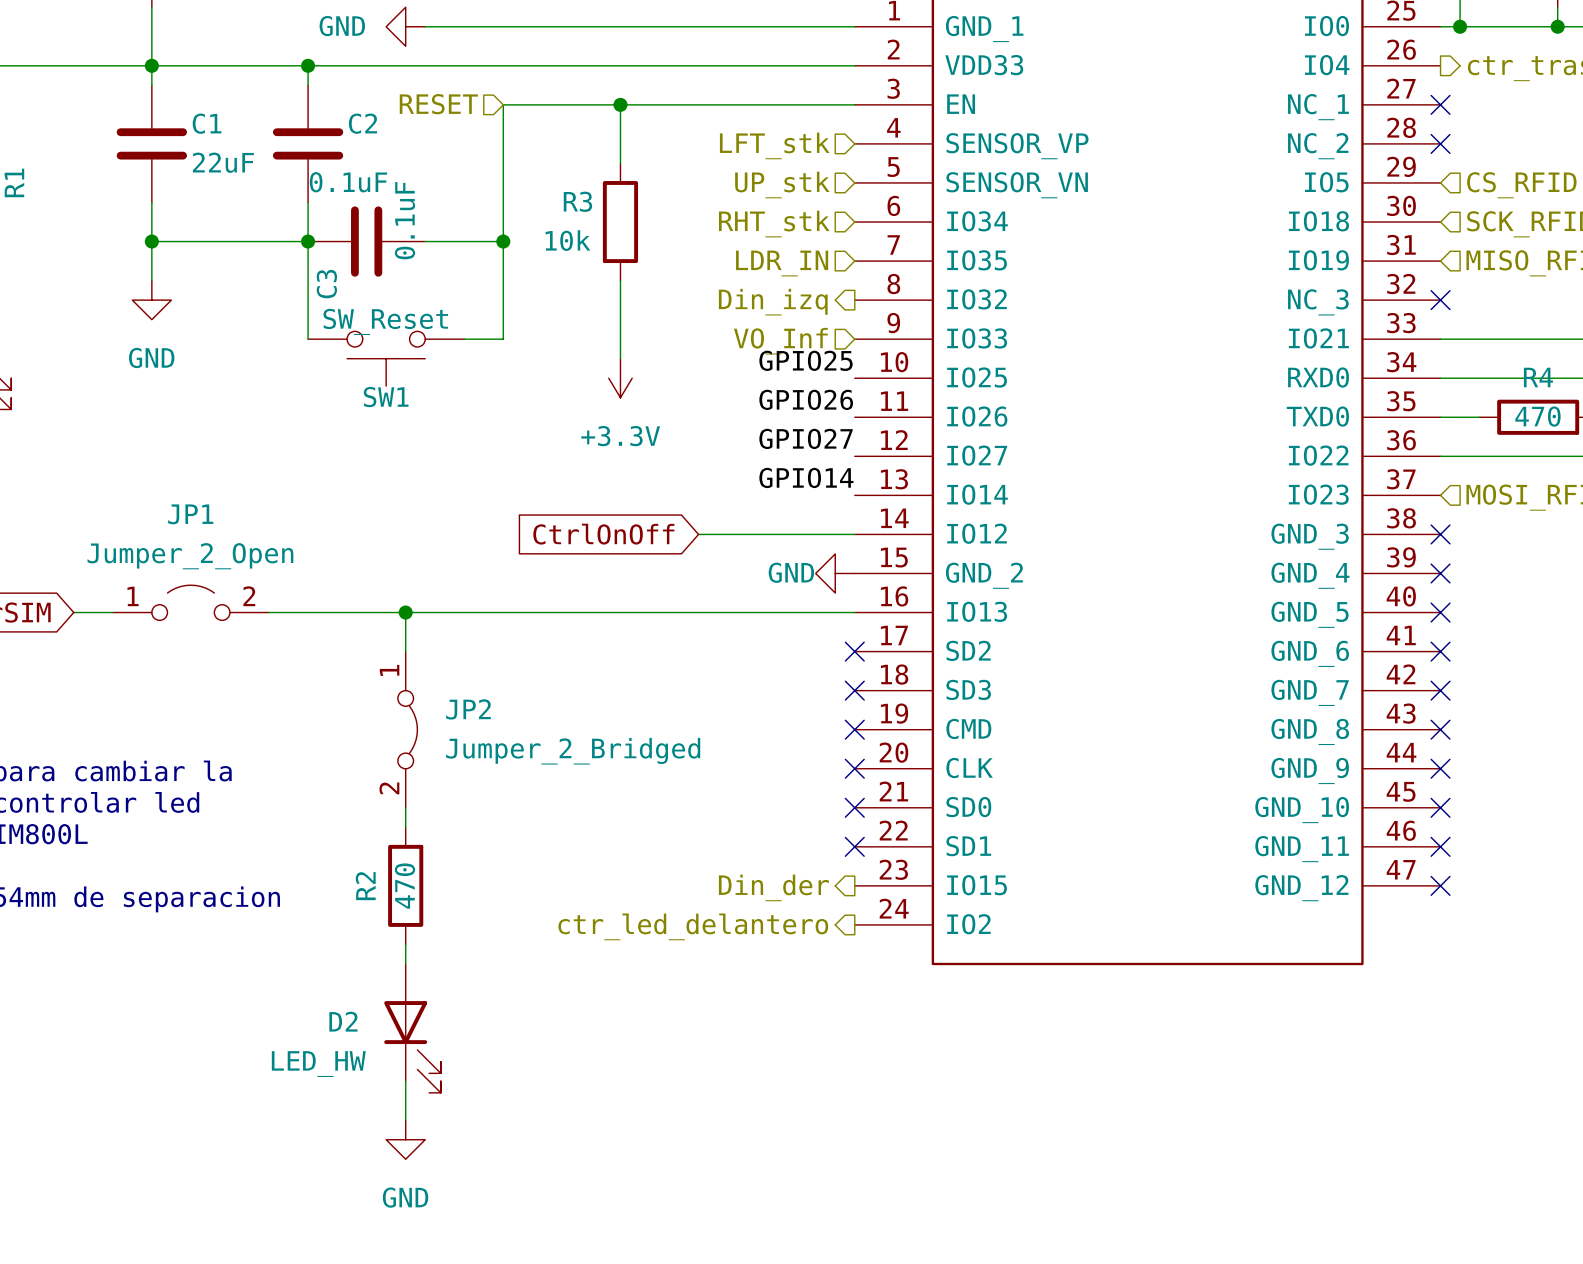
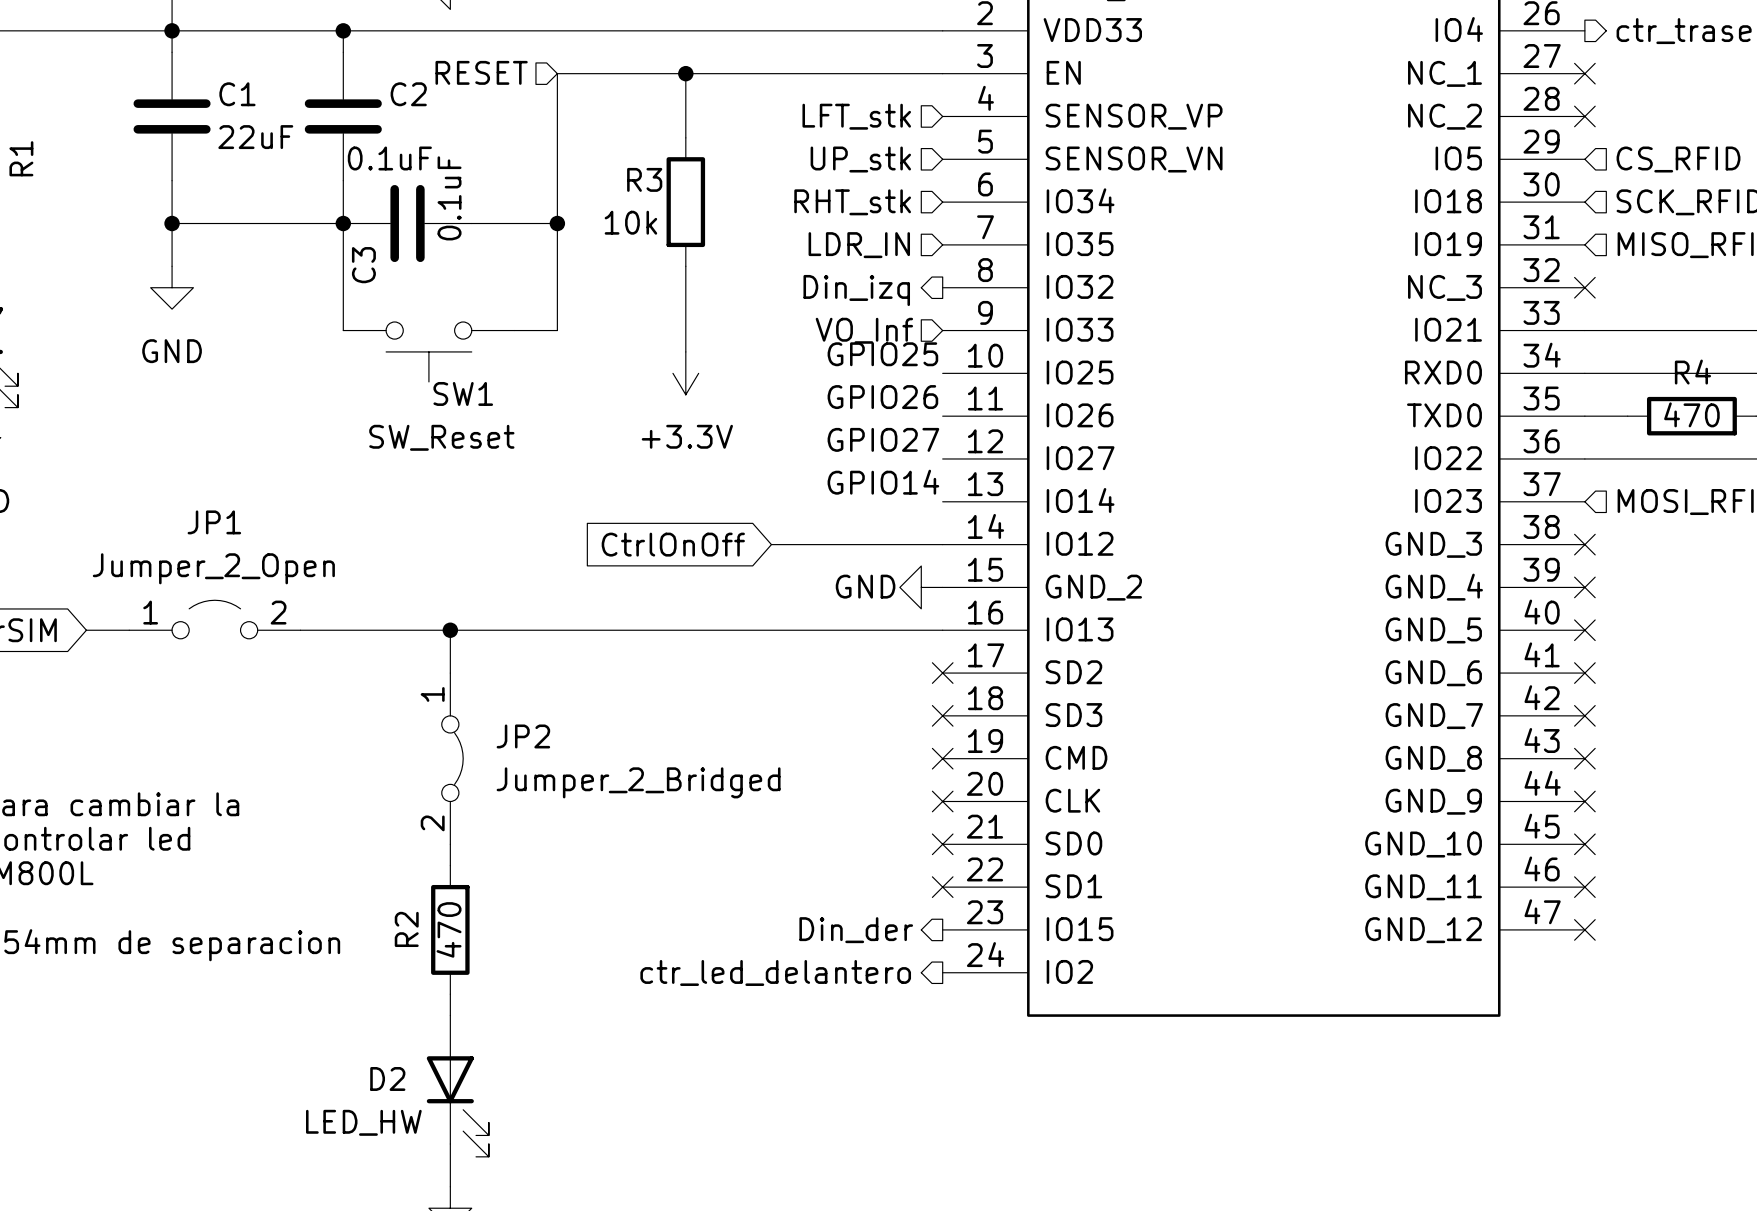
SW1 value position: SW_Reset (385, 321) -> SW_Reset (441, 437)
SW1 name position: SW1 (386, 397) -> SW1 (463, 393)

